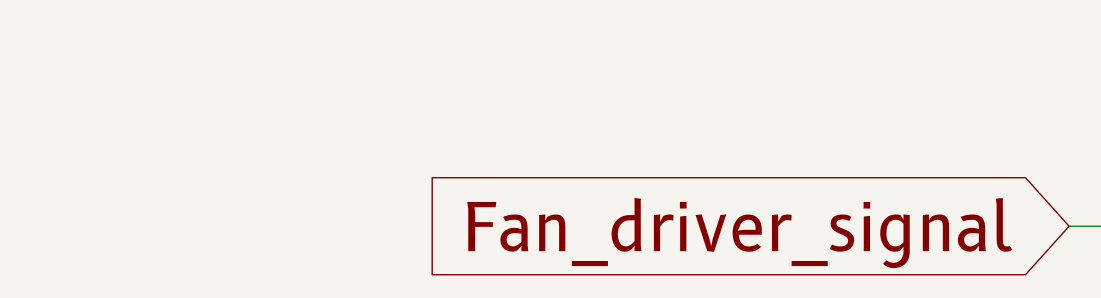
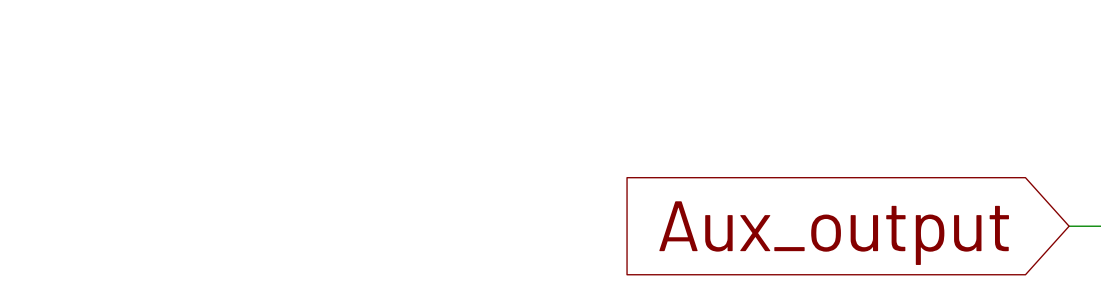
global label: Fan_driver_signal (739, 233) -> Aux_output (834, 233)

